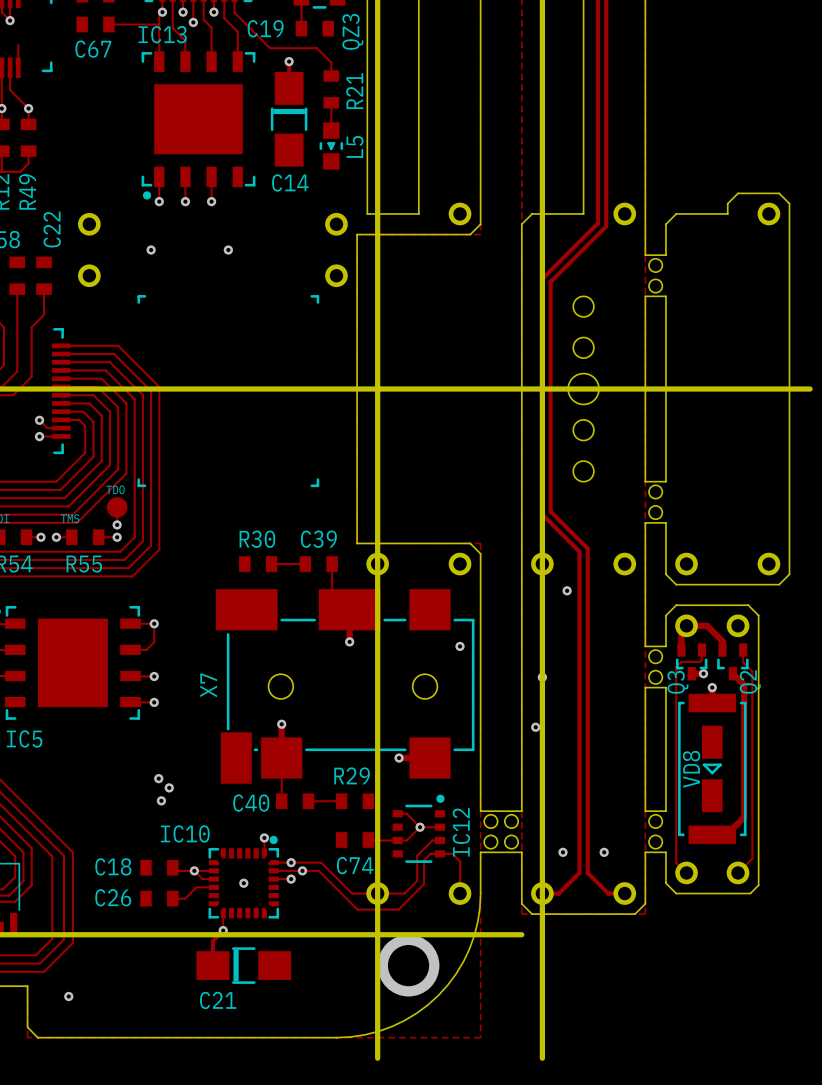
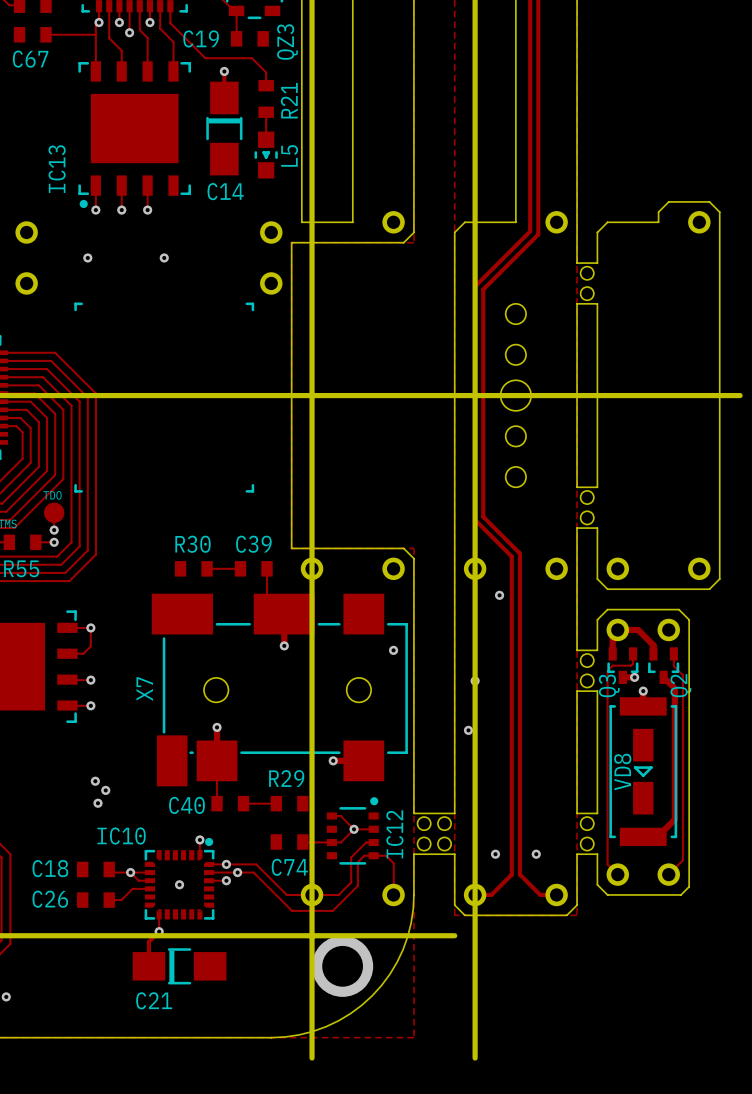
IC13 name rotation: 0° (162, 34) -> 90° counterclockwise (57, 169)
IC13 name position: IC13 (162, 34) -> IC13 (57, 169)

